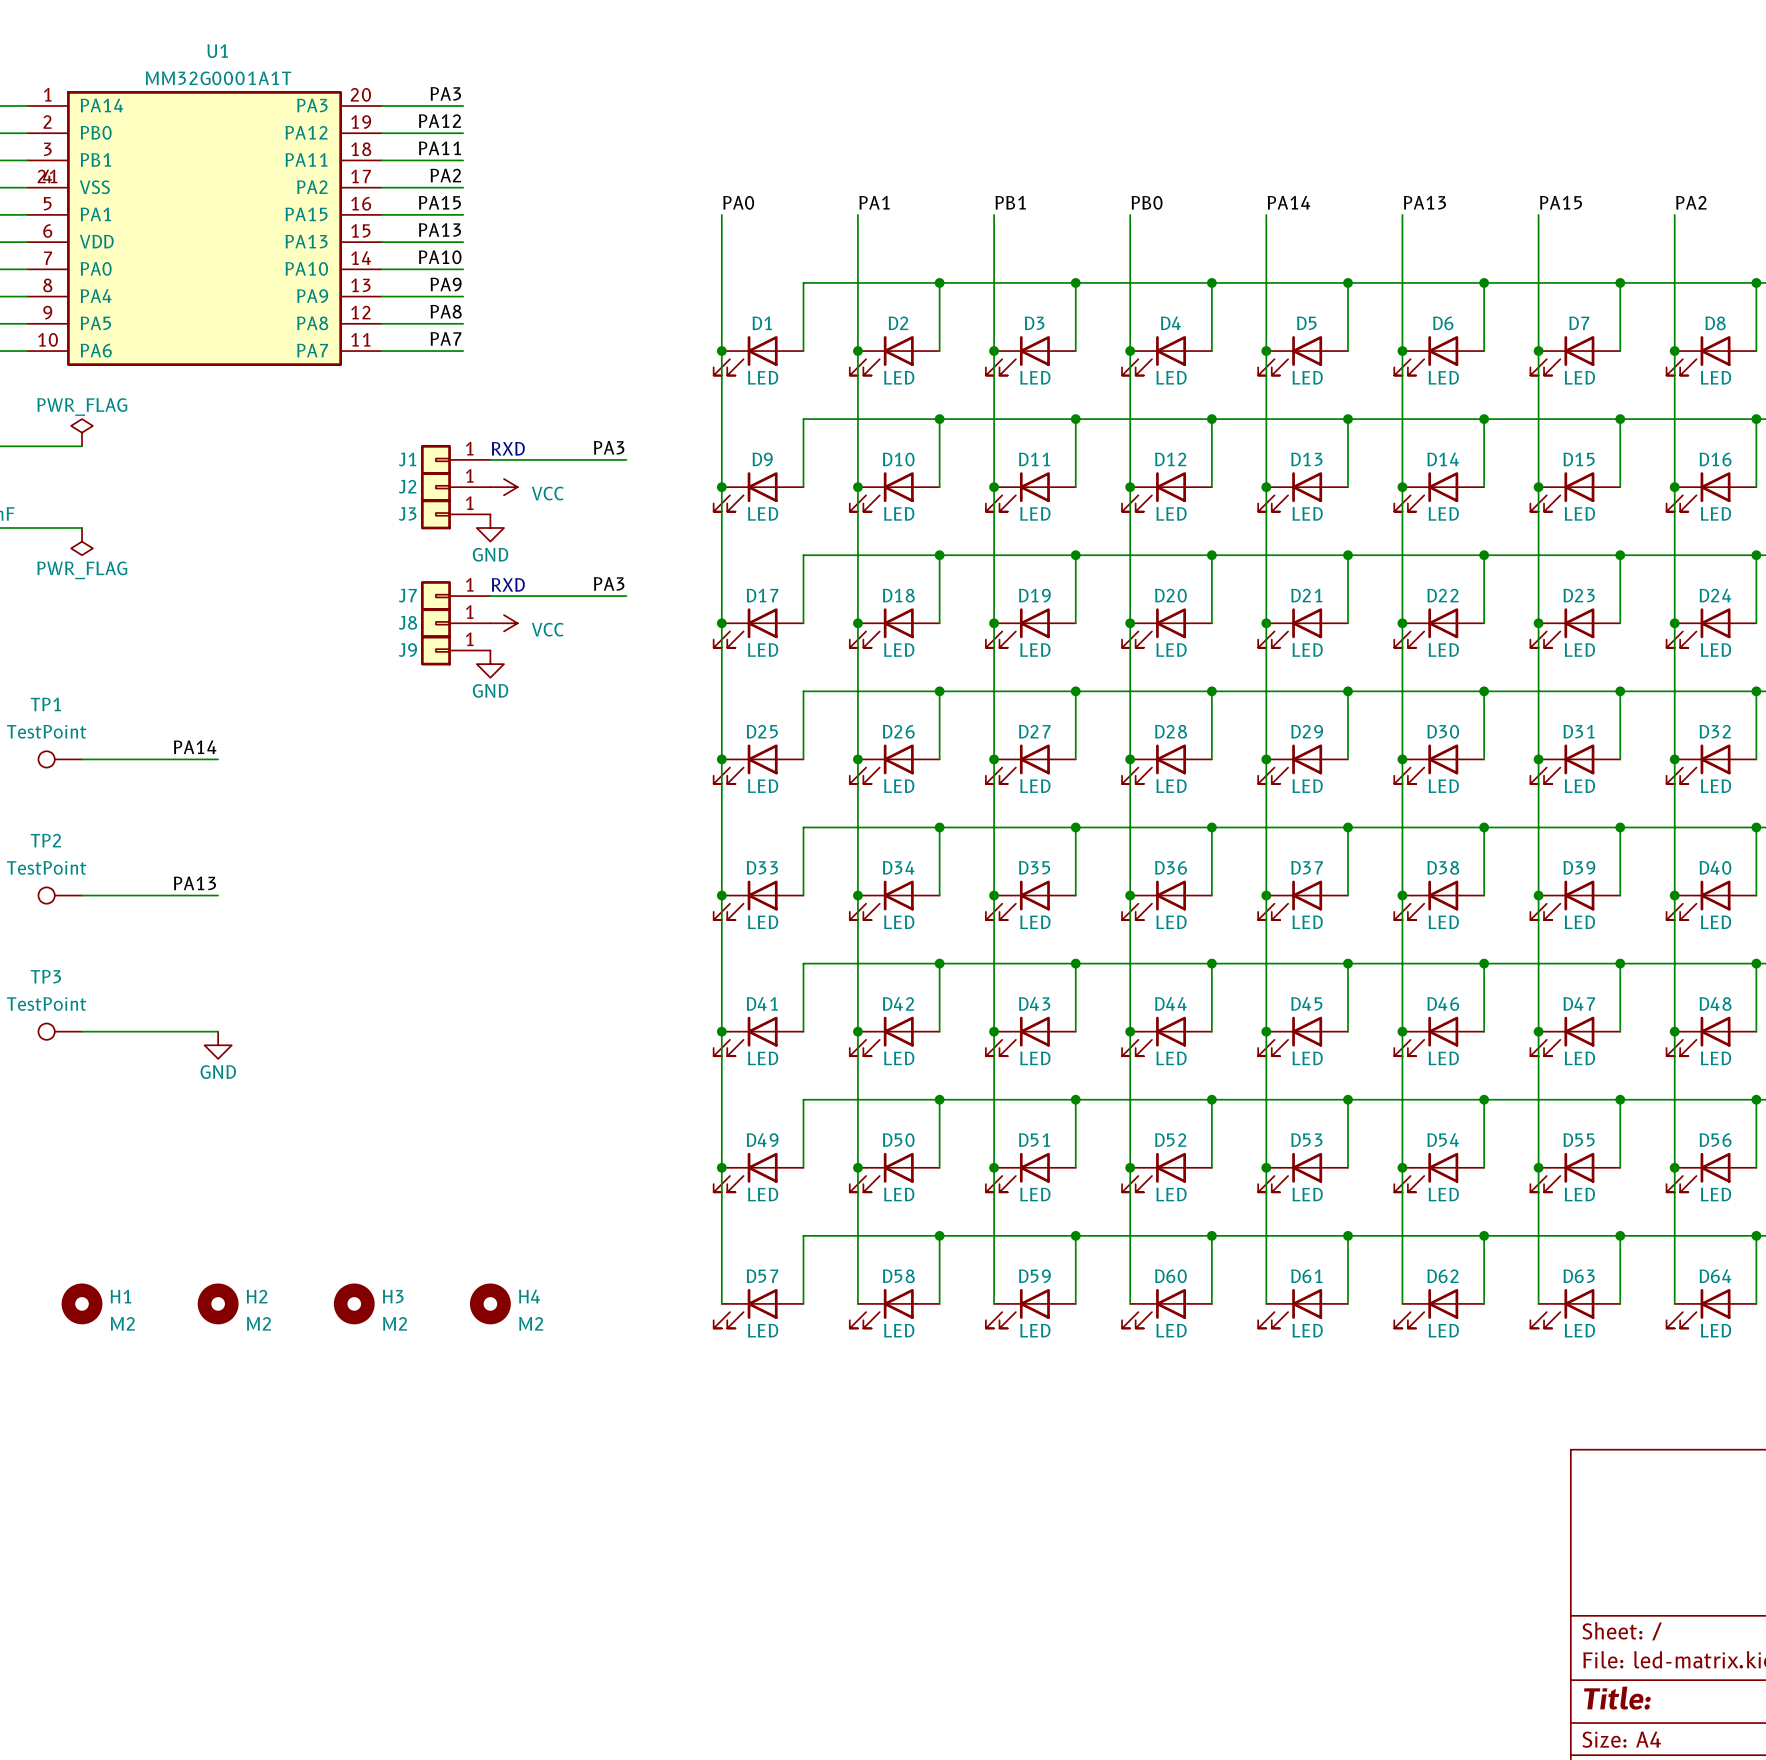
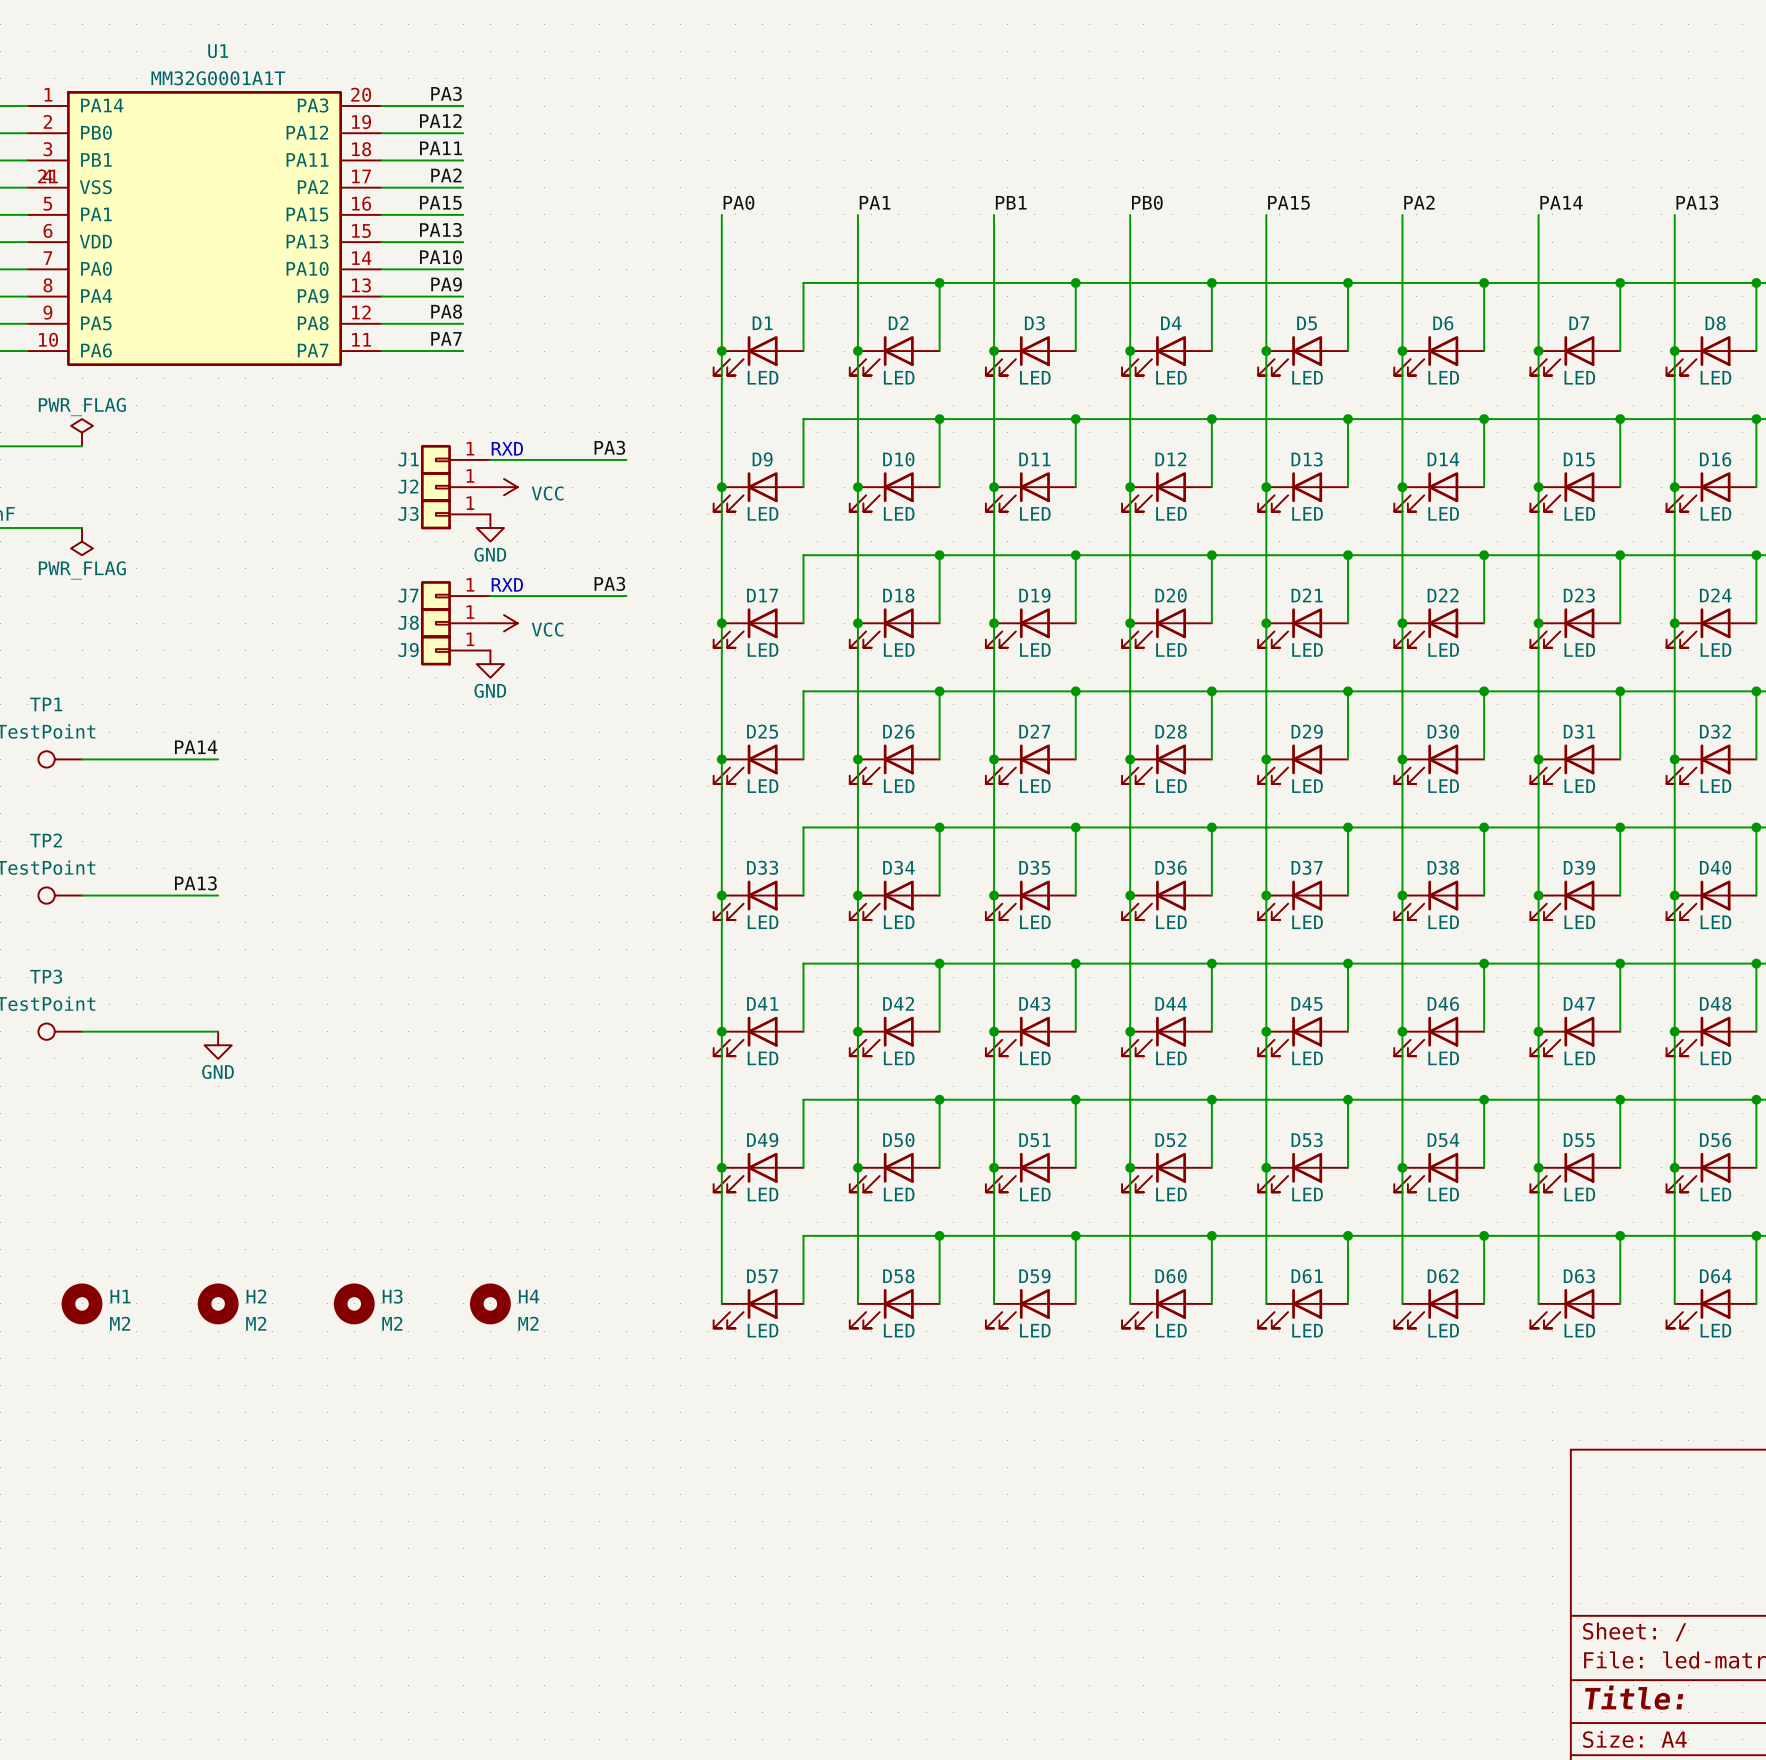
label: PA14 (1288, 202) -> PA15 (1288, 202)
label: PA13 (1424, 202) -> PA2 (1419, 202)
label: PA15 (1560, 202) -> PA14 (1561, 202)
label: PA2 (1691, 202) -> PA13 (1697, 202)

